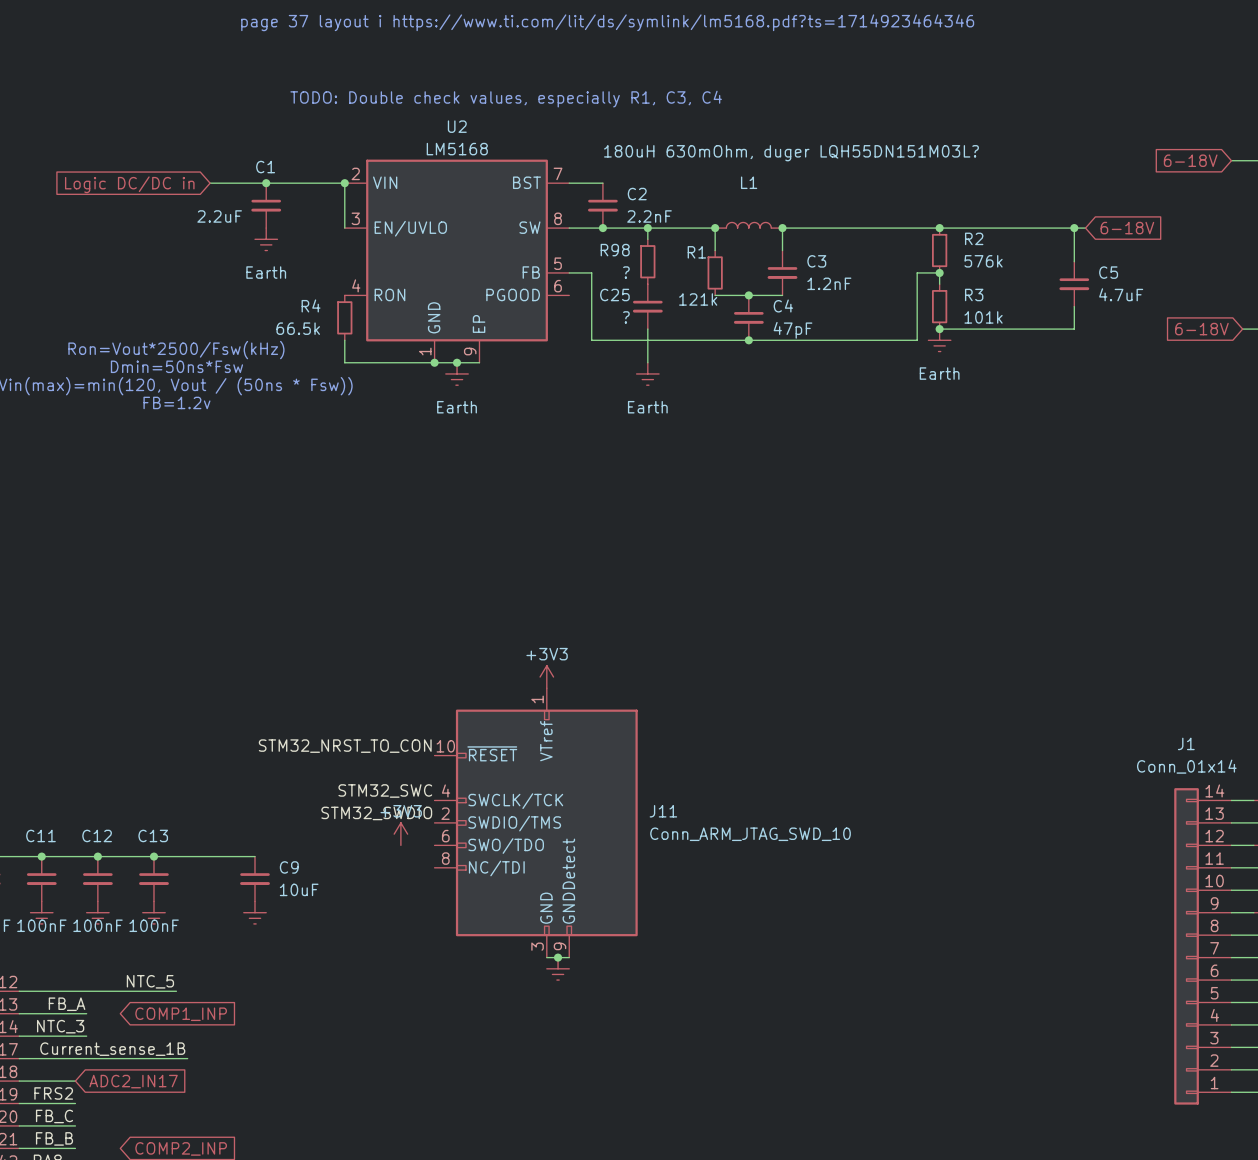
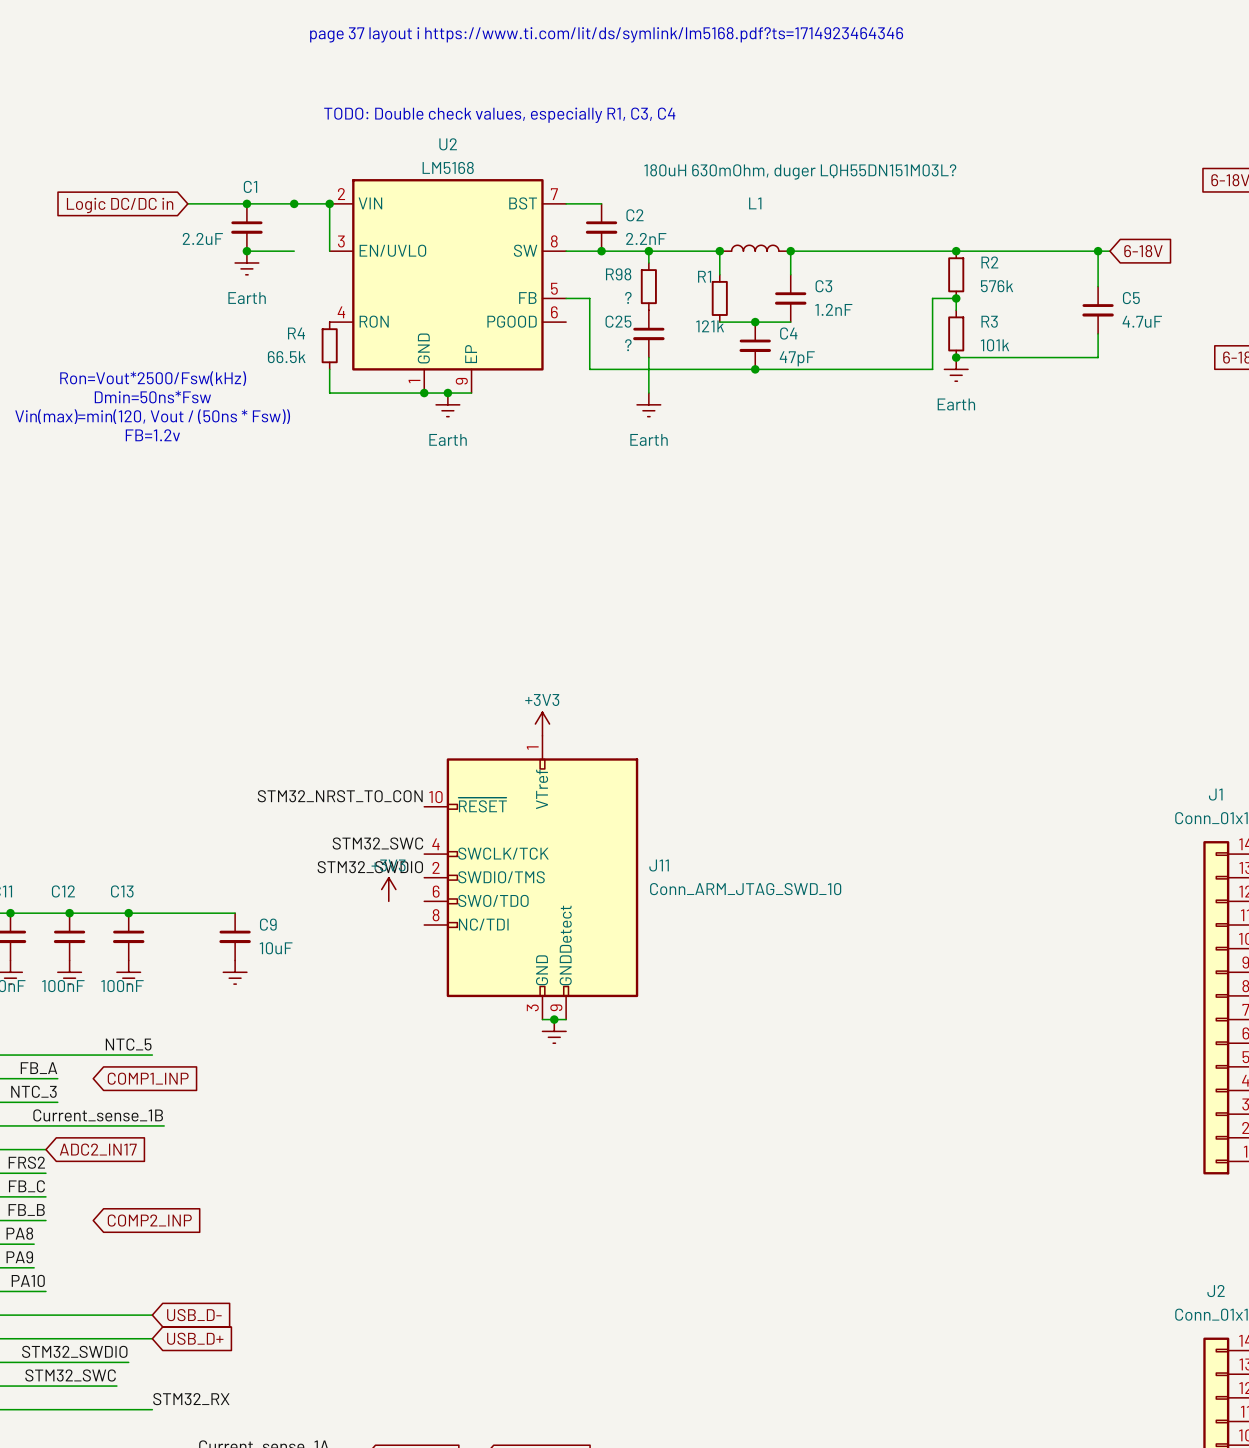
junction: none -> (294, 203)
wire: none -> (246, 251) (294, 251)
junction: none -> (246, 251)

